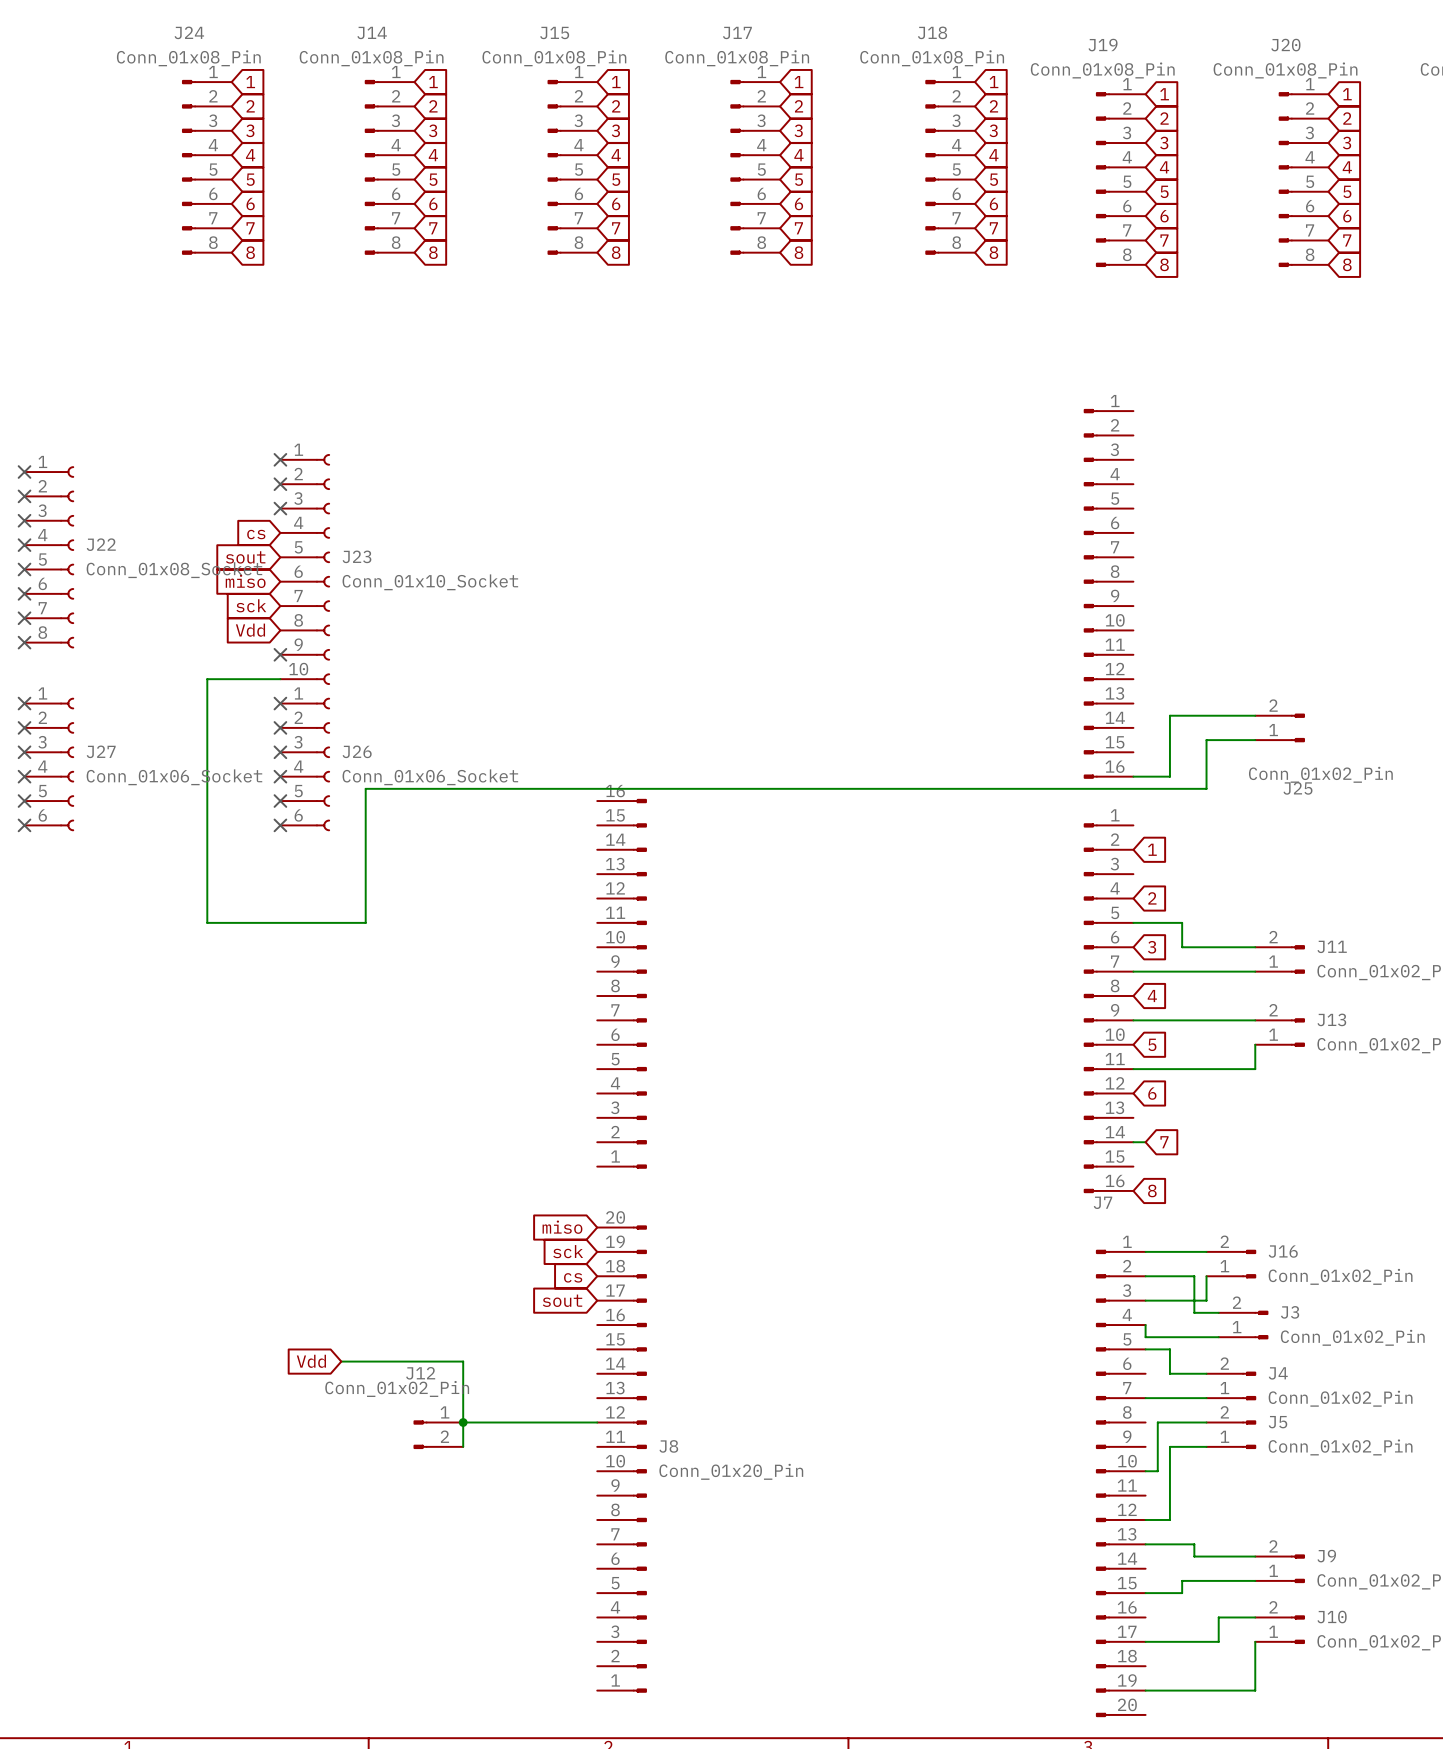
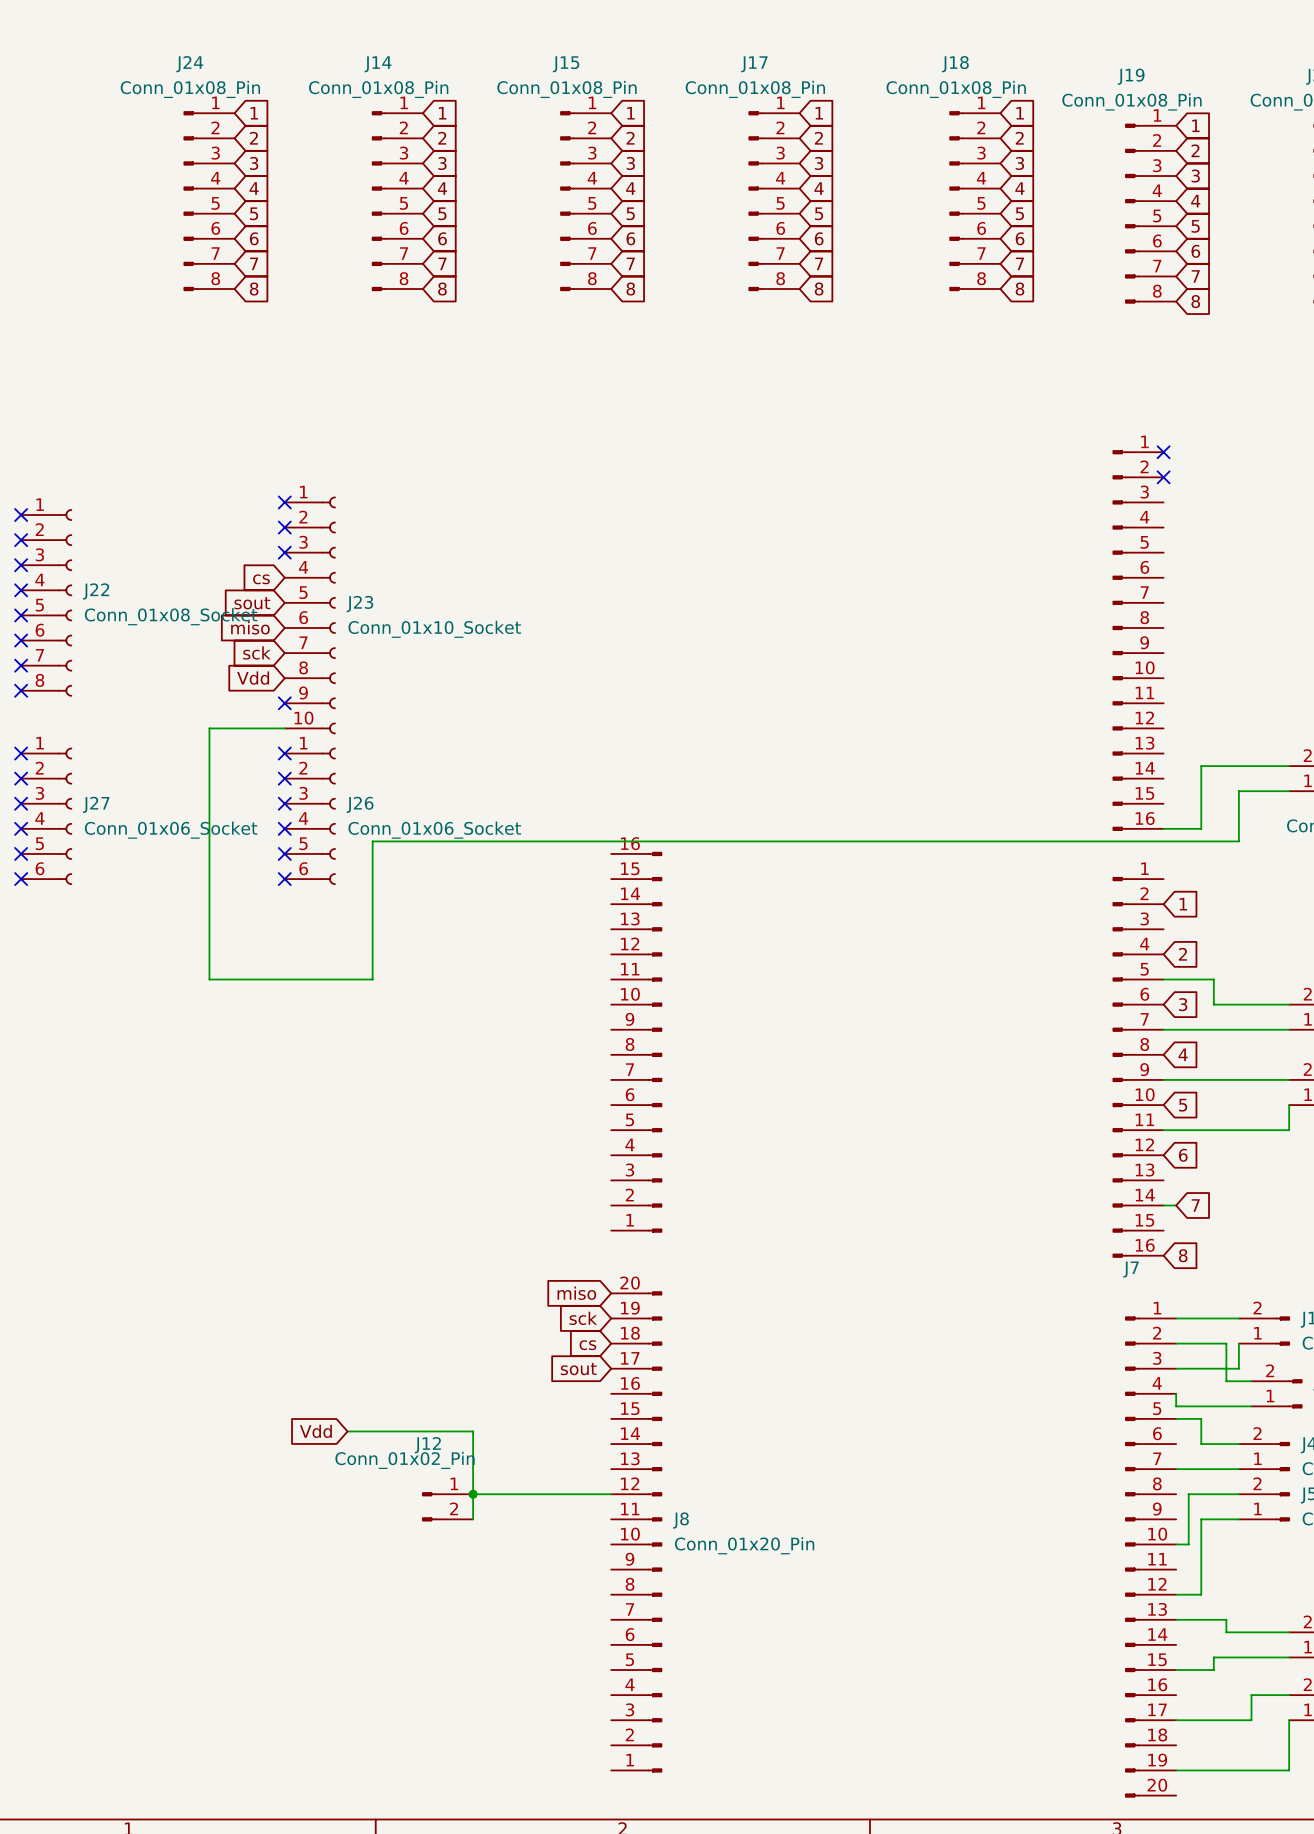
no-connect mark: none -> (1163, 452)
no-connect mark: none -> (1163, 477)

